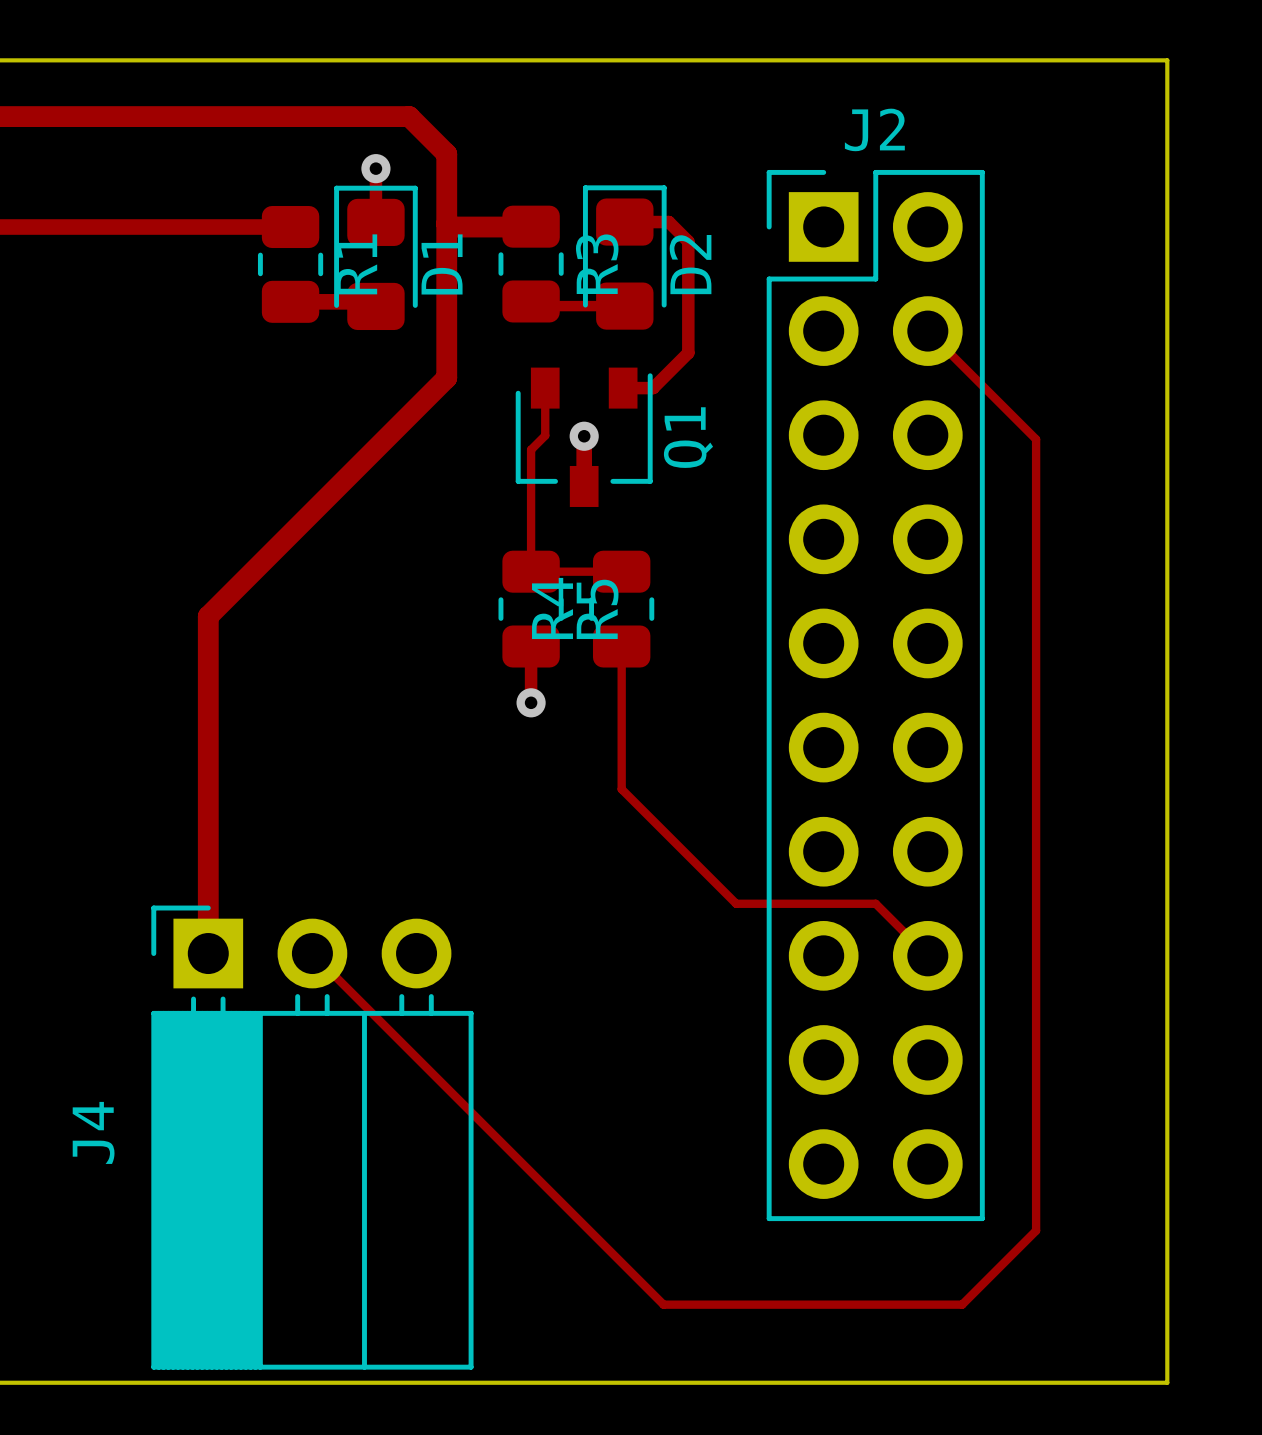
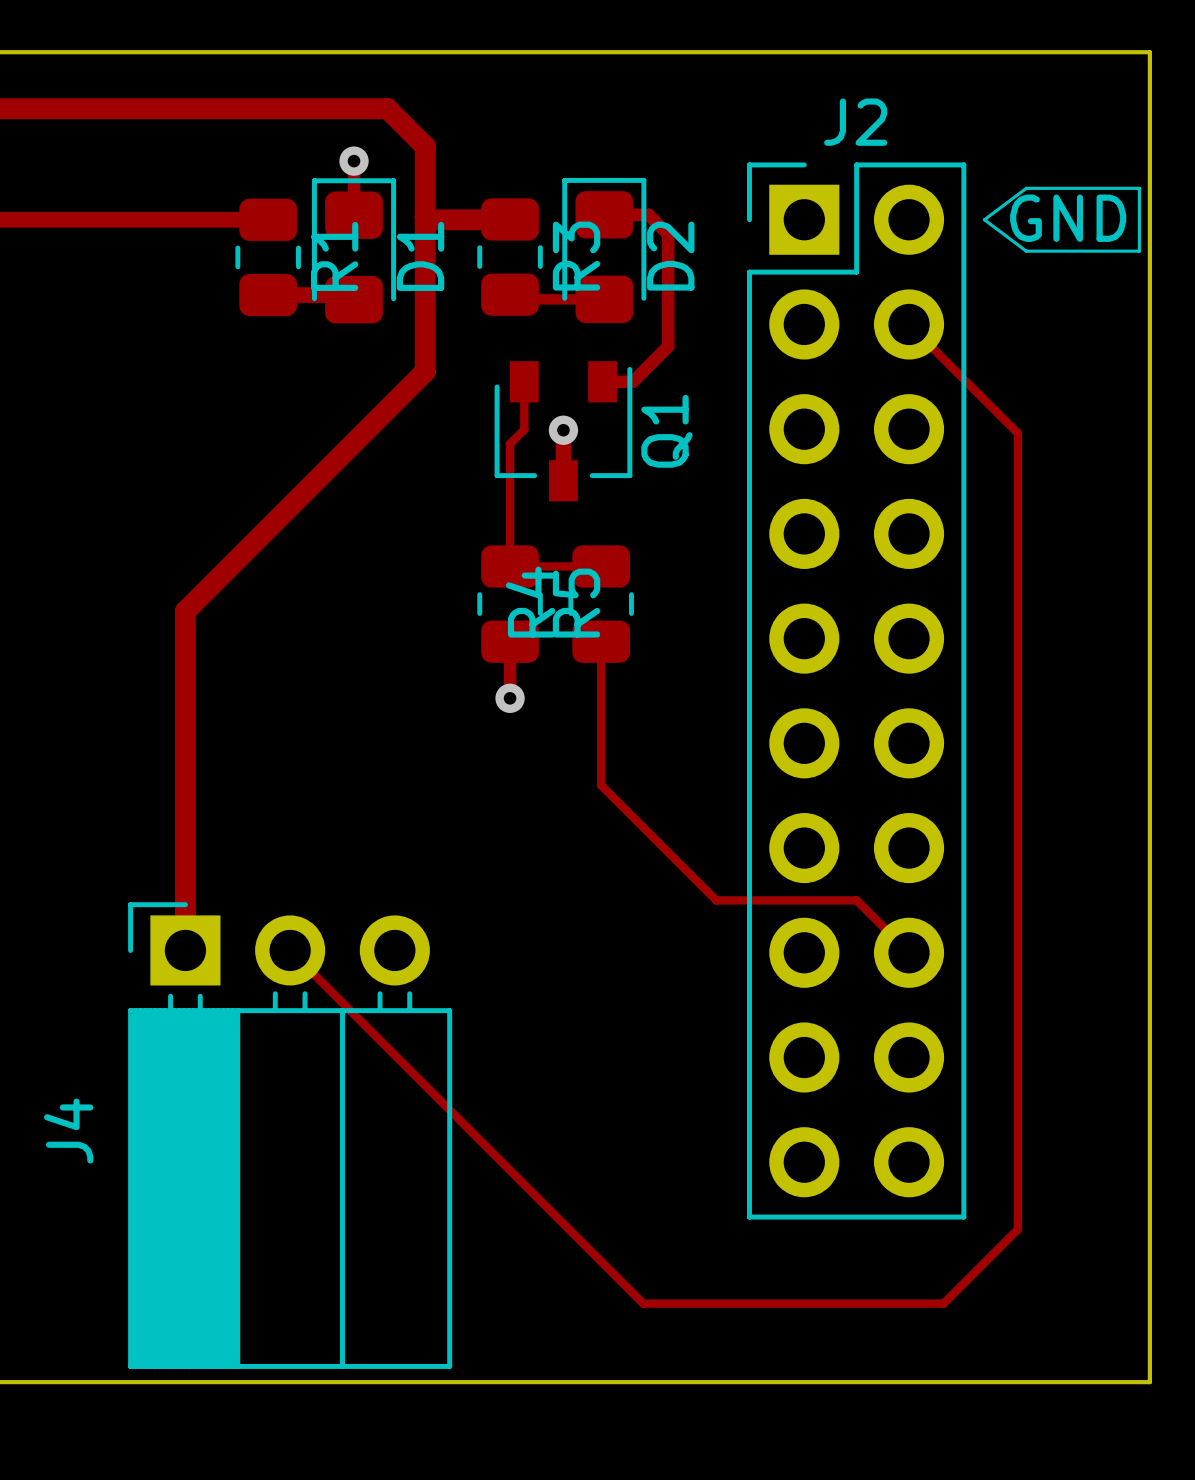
line: none -> (1026, 188) (984, 219) (1026, 251) (1139, 251) (1139, 188) (1026, 188)
text: none -> GND (1068, 218)

